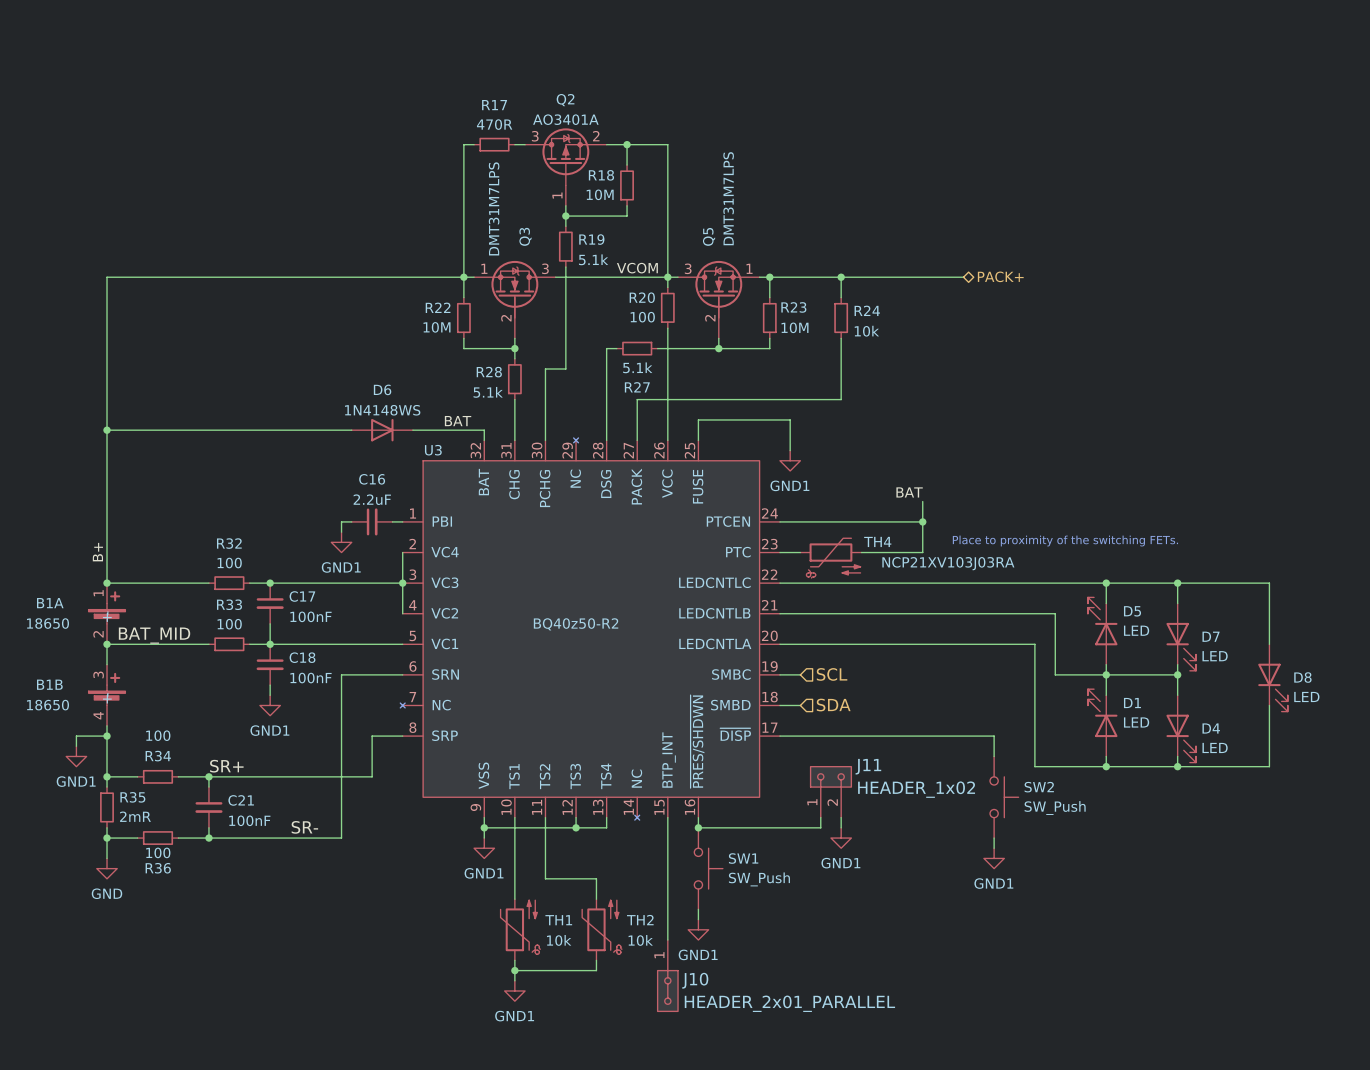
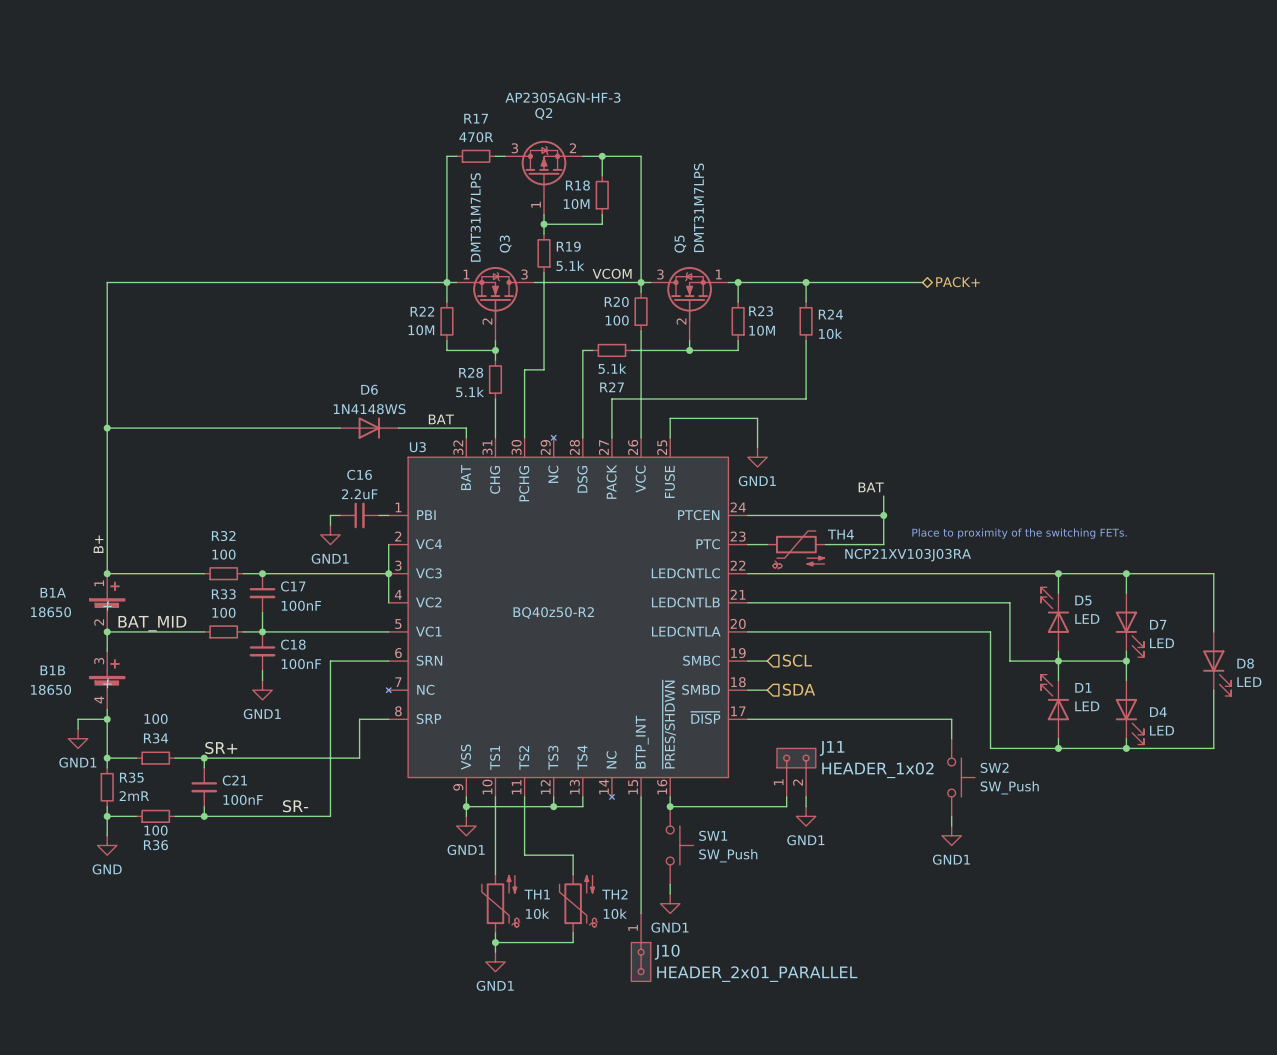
Q2 value: AO3401A (565, 119) -> AP2305AGN-HF-3 (562, 97)

